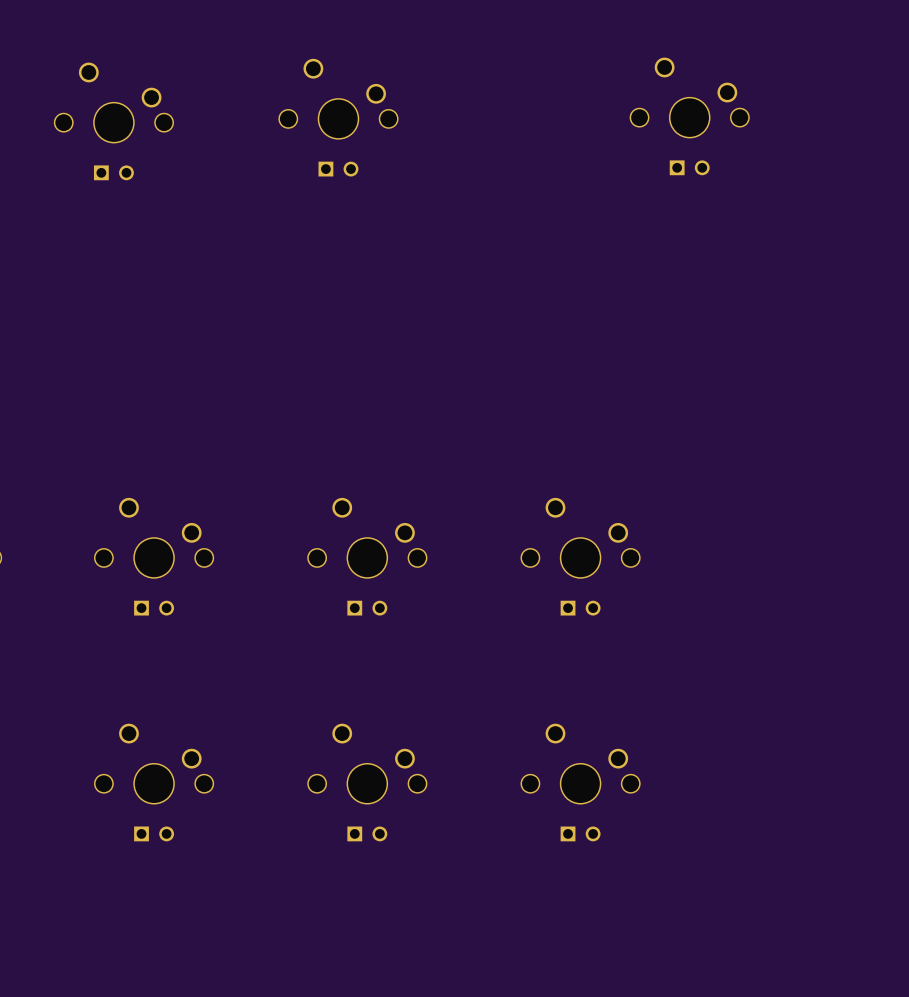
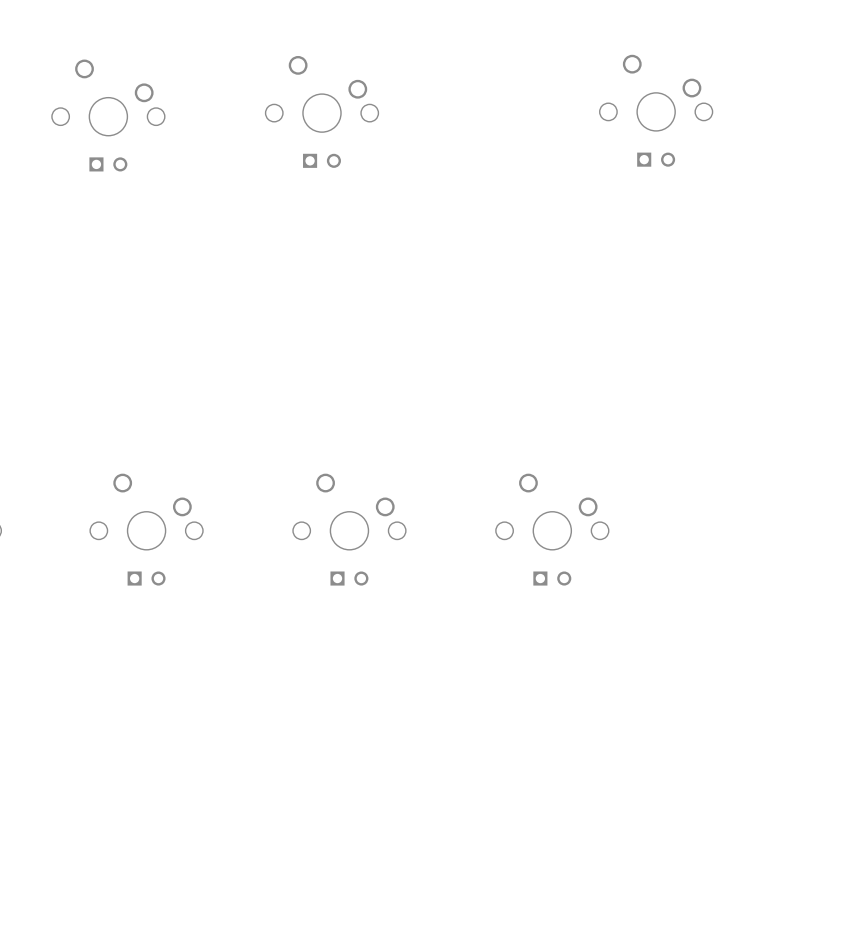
part: (154, 782) -> none
part: (367, 782) -> none
part: (580, 782) -> none

